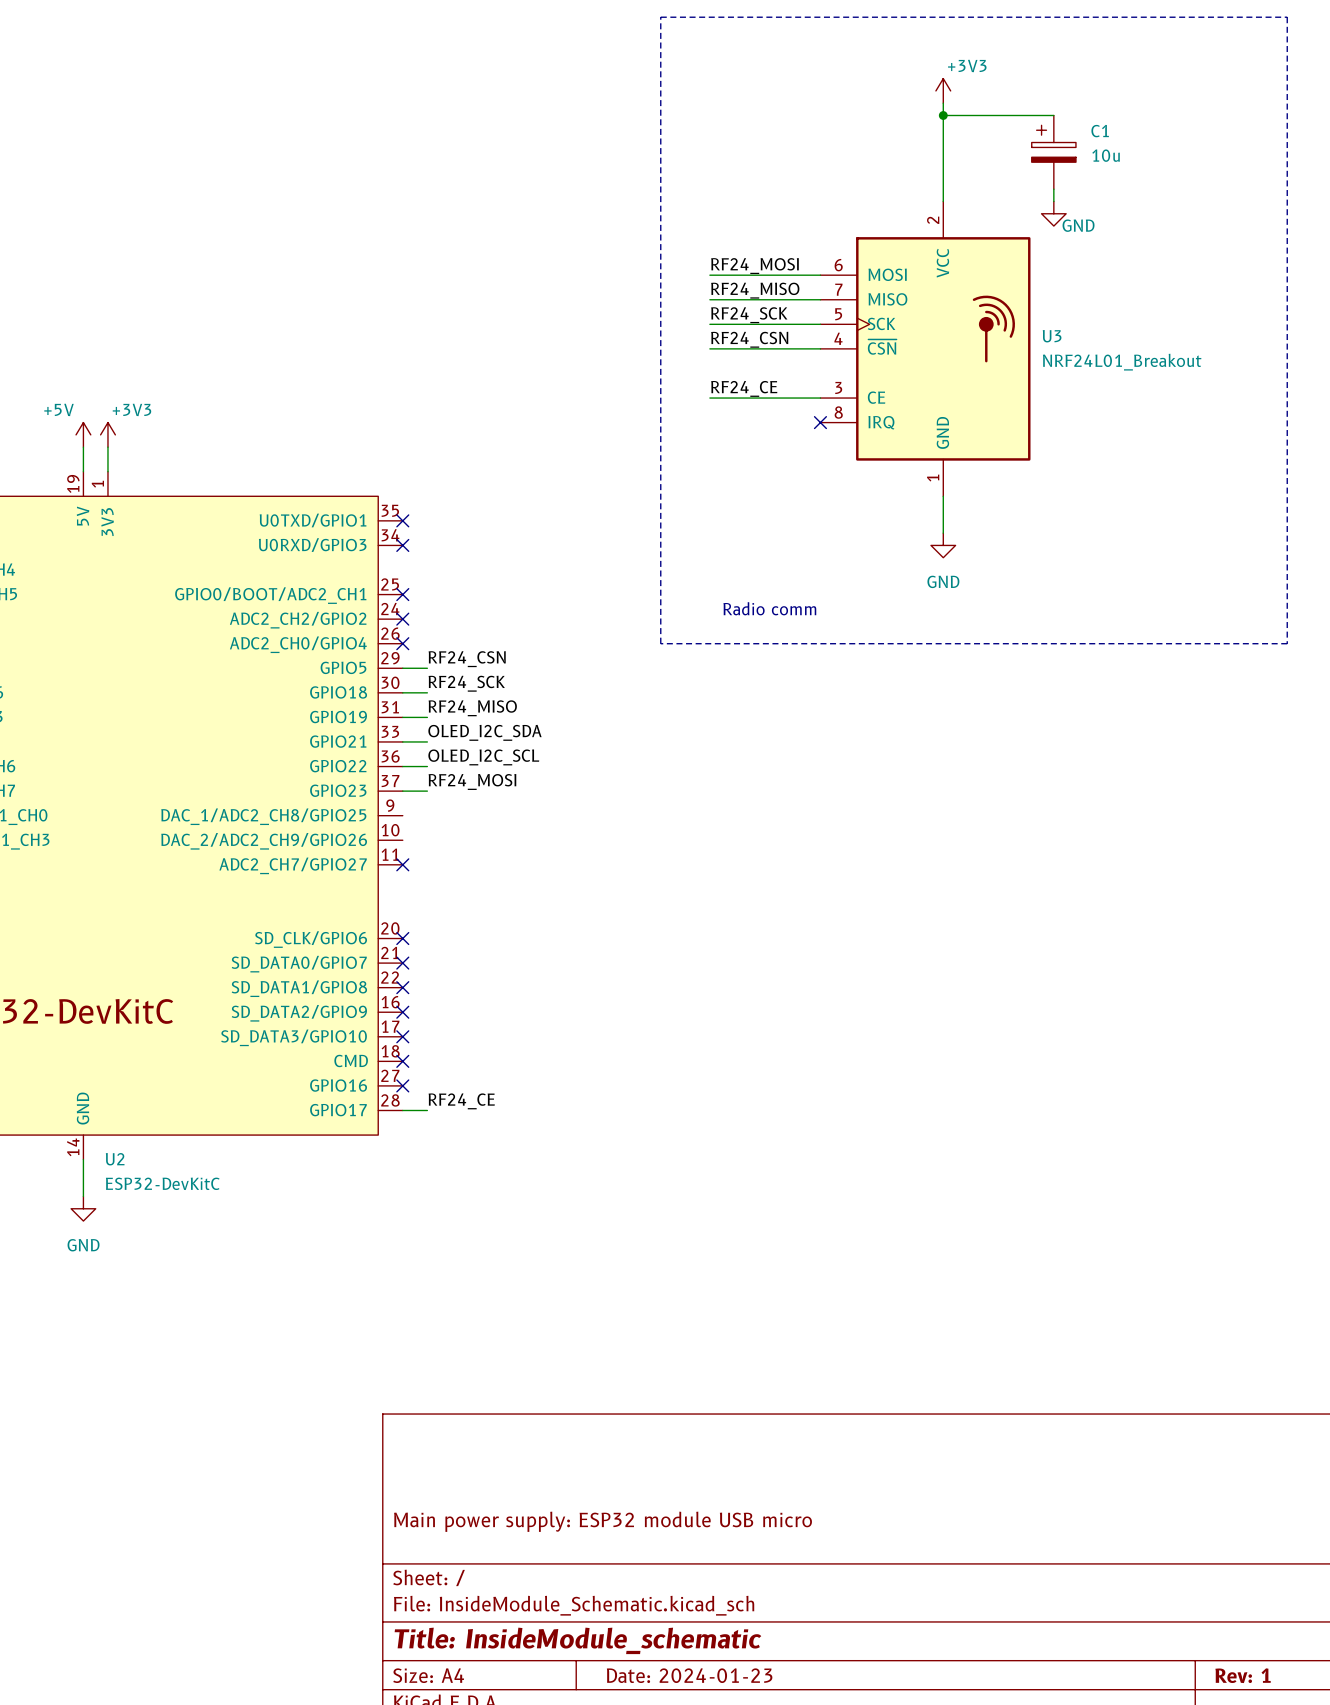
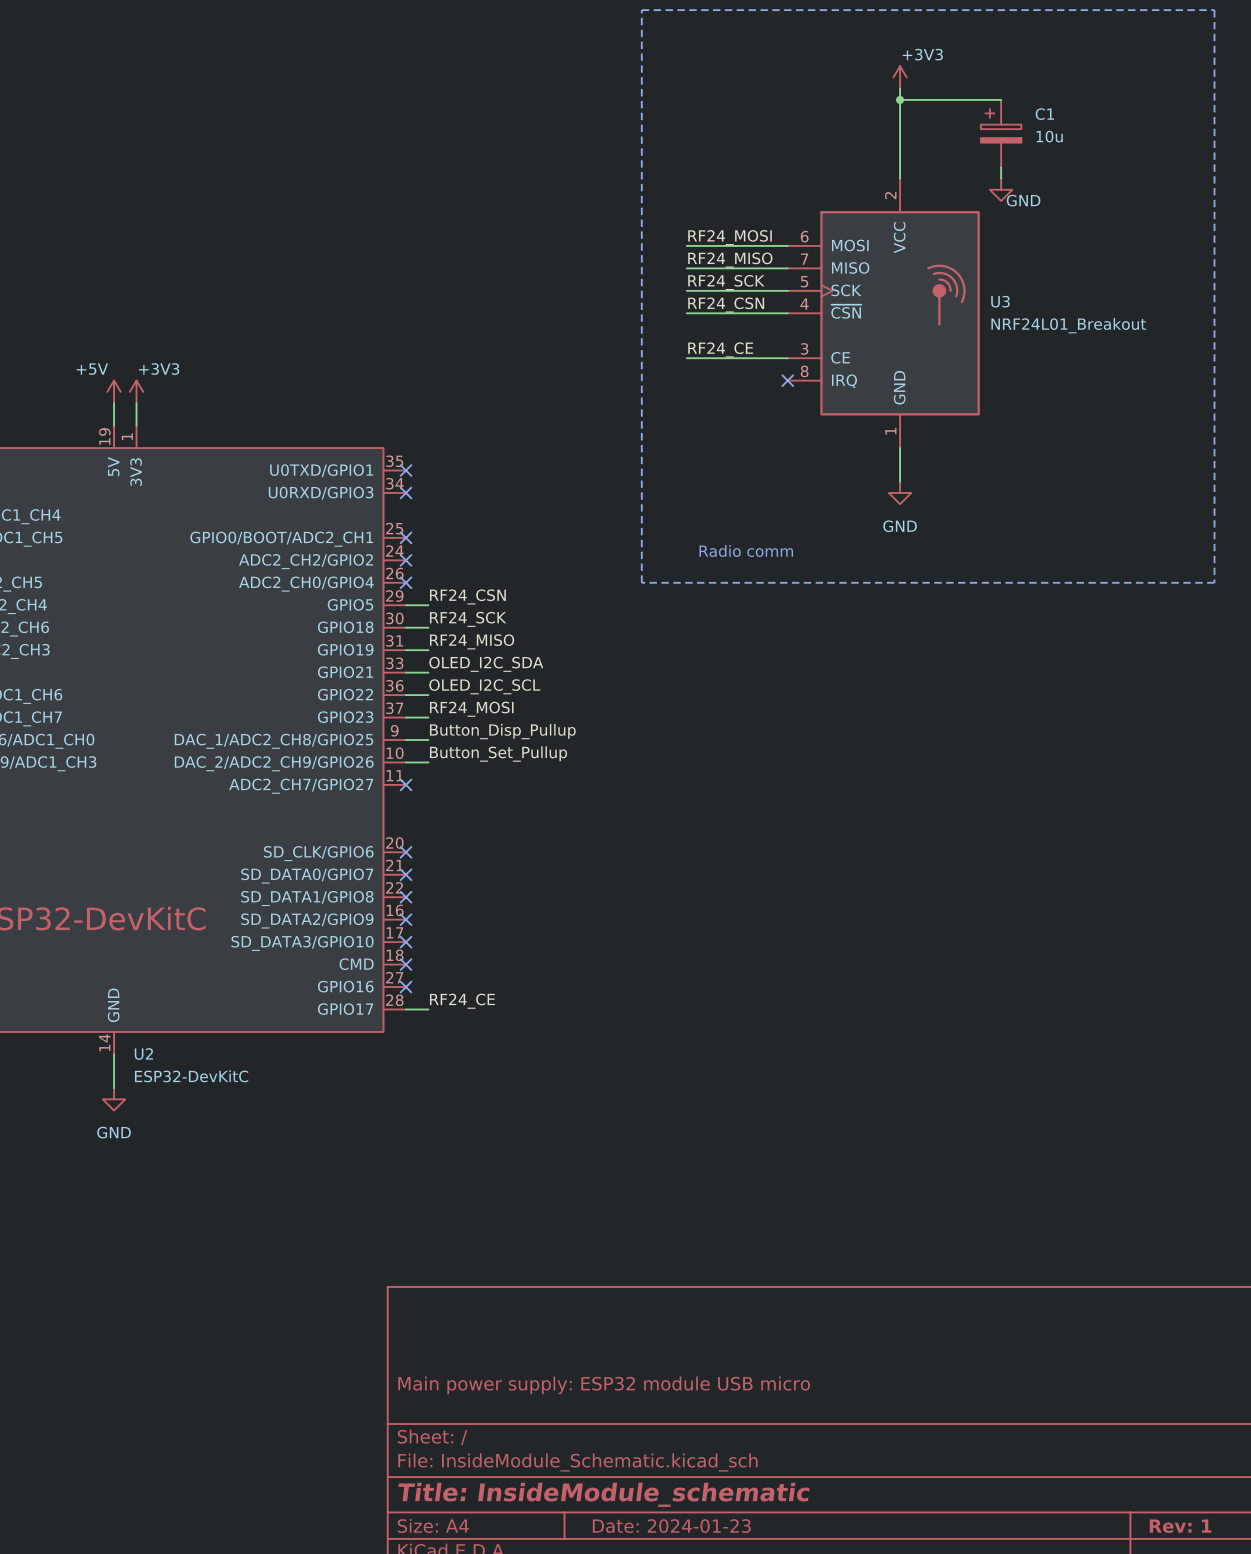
label: none -> Button_Disp_Pullup (502, 731)
wire: none -> (406, 740) (428, 740)
label: none -> Button_Set_Pullup (498, 754)
wire: none -> (406, 762) (428, 762)

